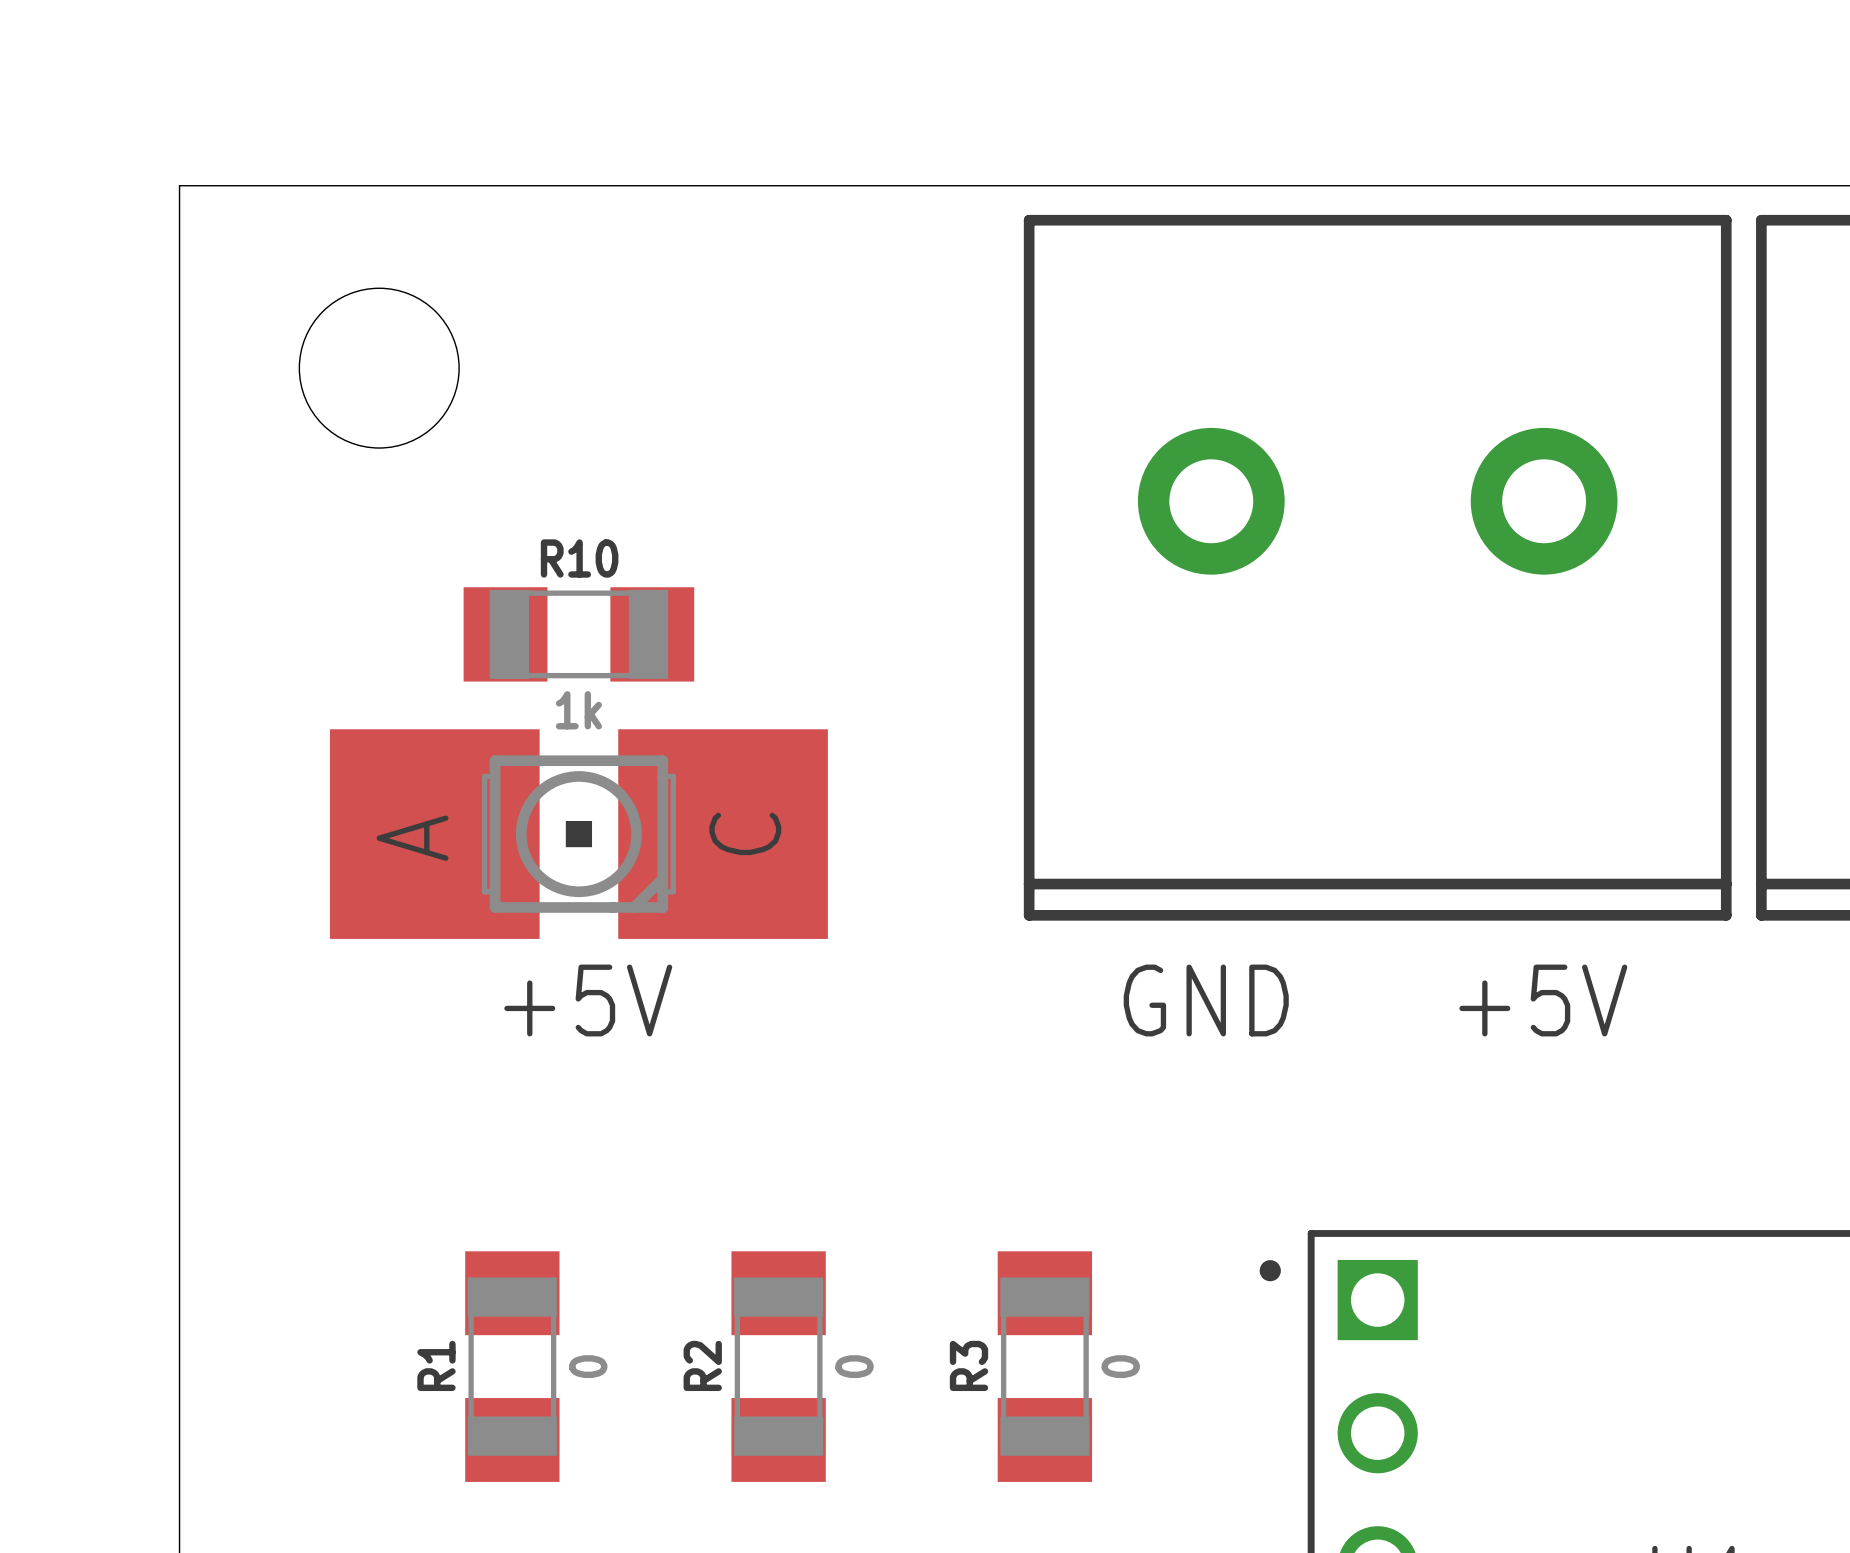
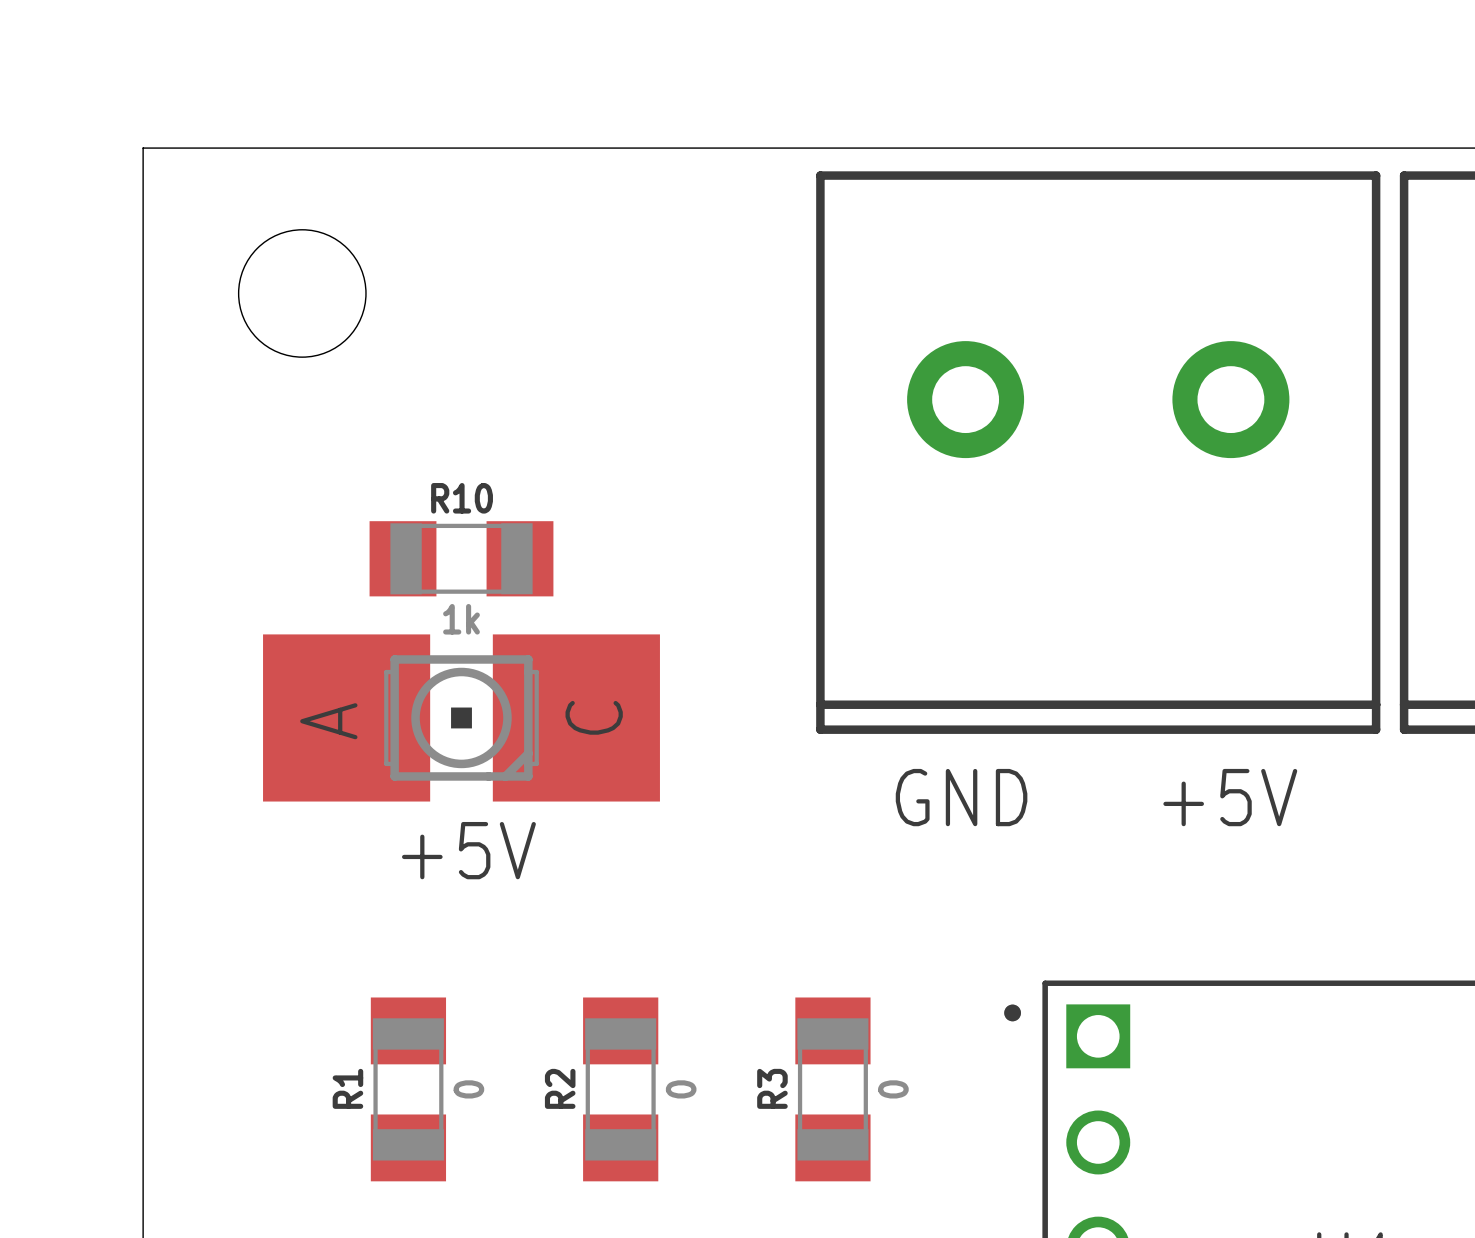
R10 position: (578, 634) -> (461, 558)
+5V position: (578, 834) -> (461, 717)

